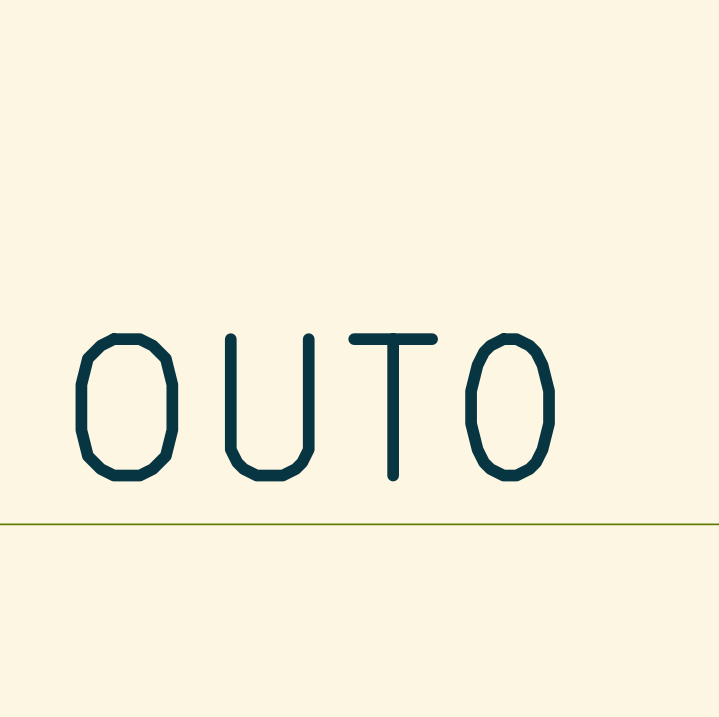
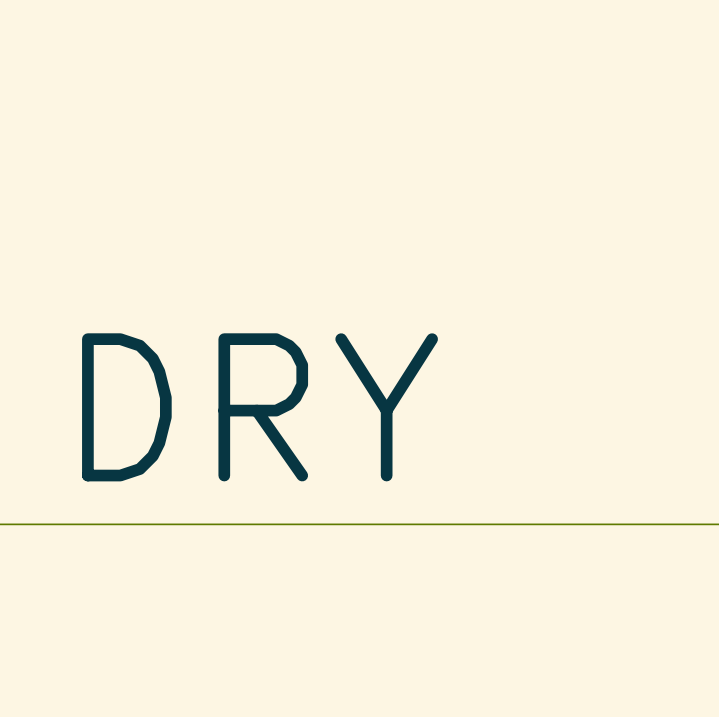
label: OUT0 (315, 407) -> DRY (260, 407)

